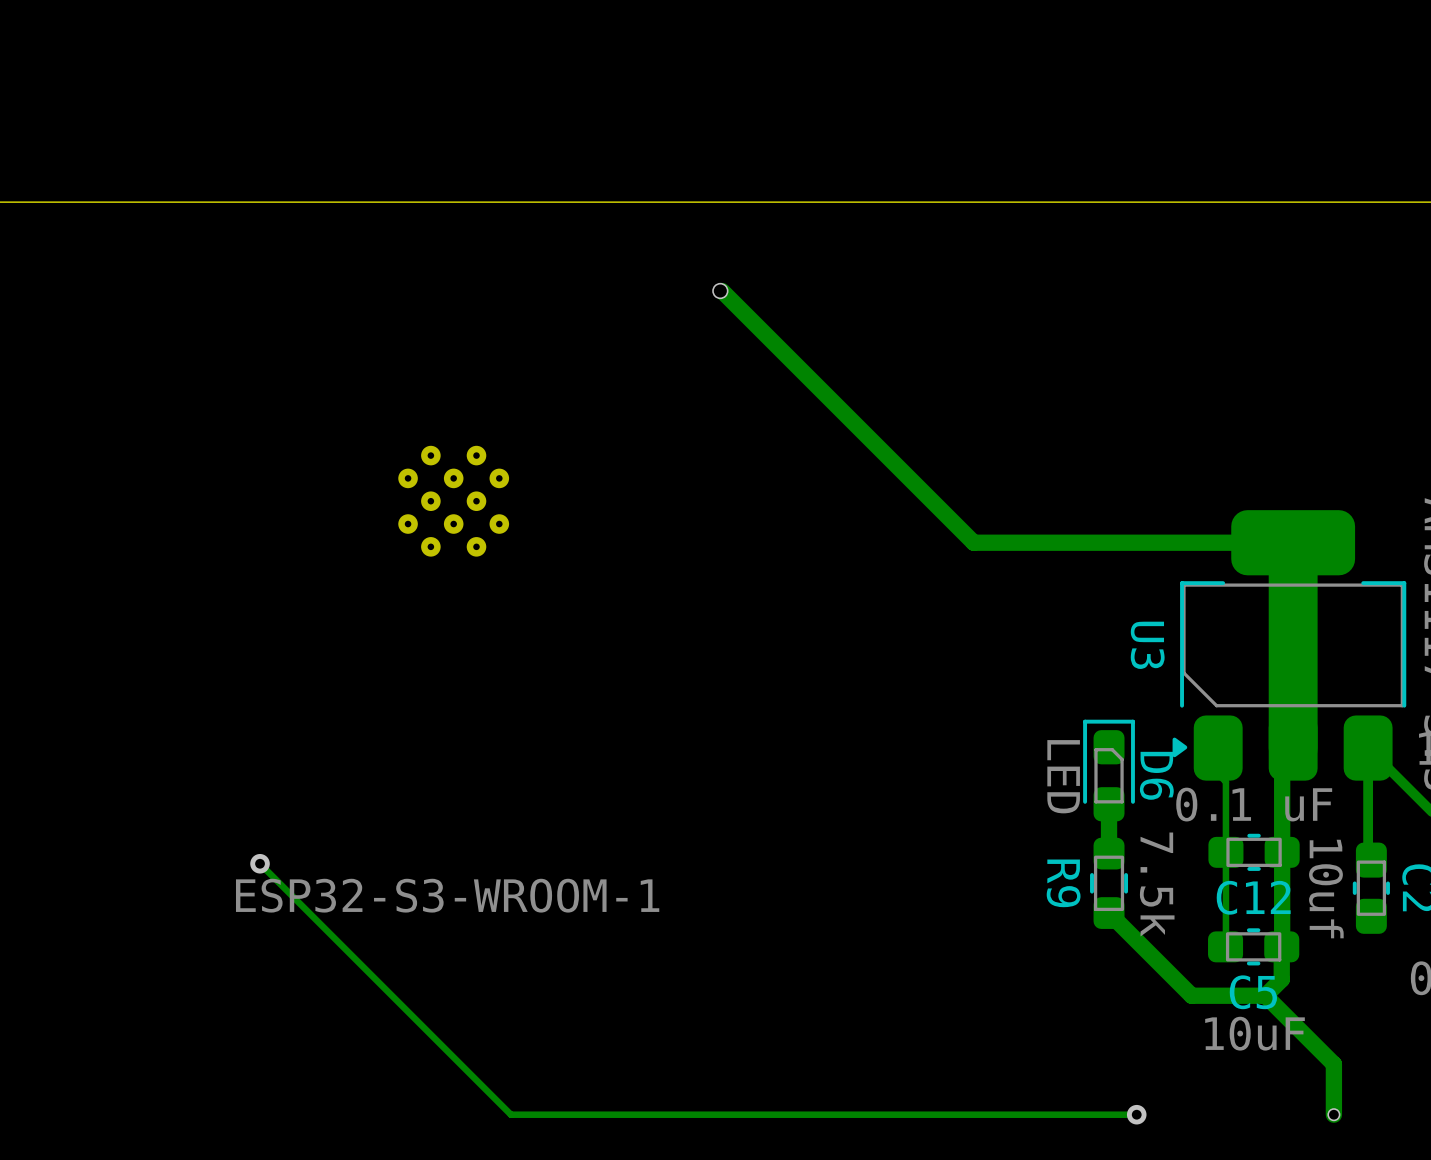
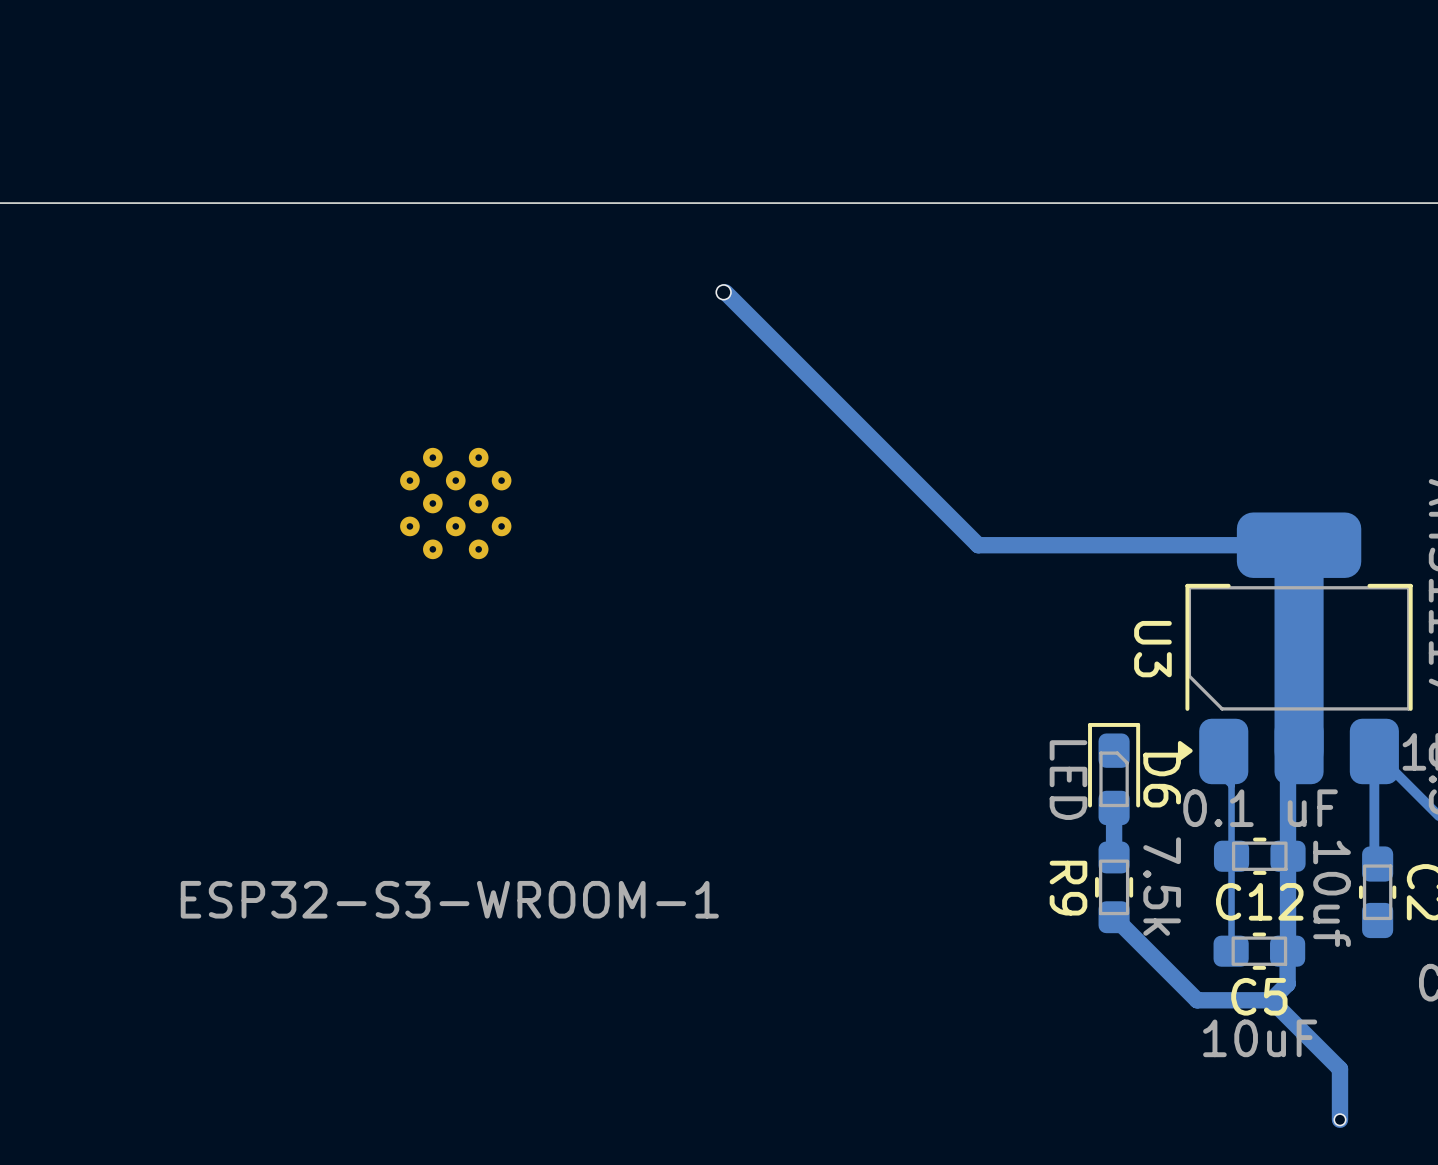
track: (260, 863) (510, 1114) (1136, 1114) -> none
via: (260, 863) -> none
via: (1136, 1114) -> none

